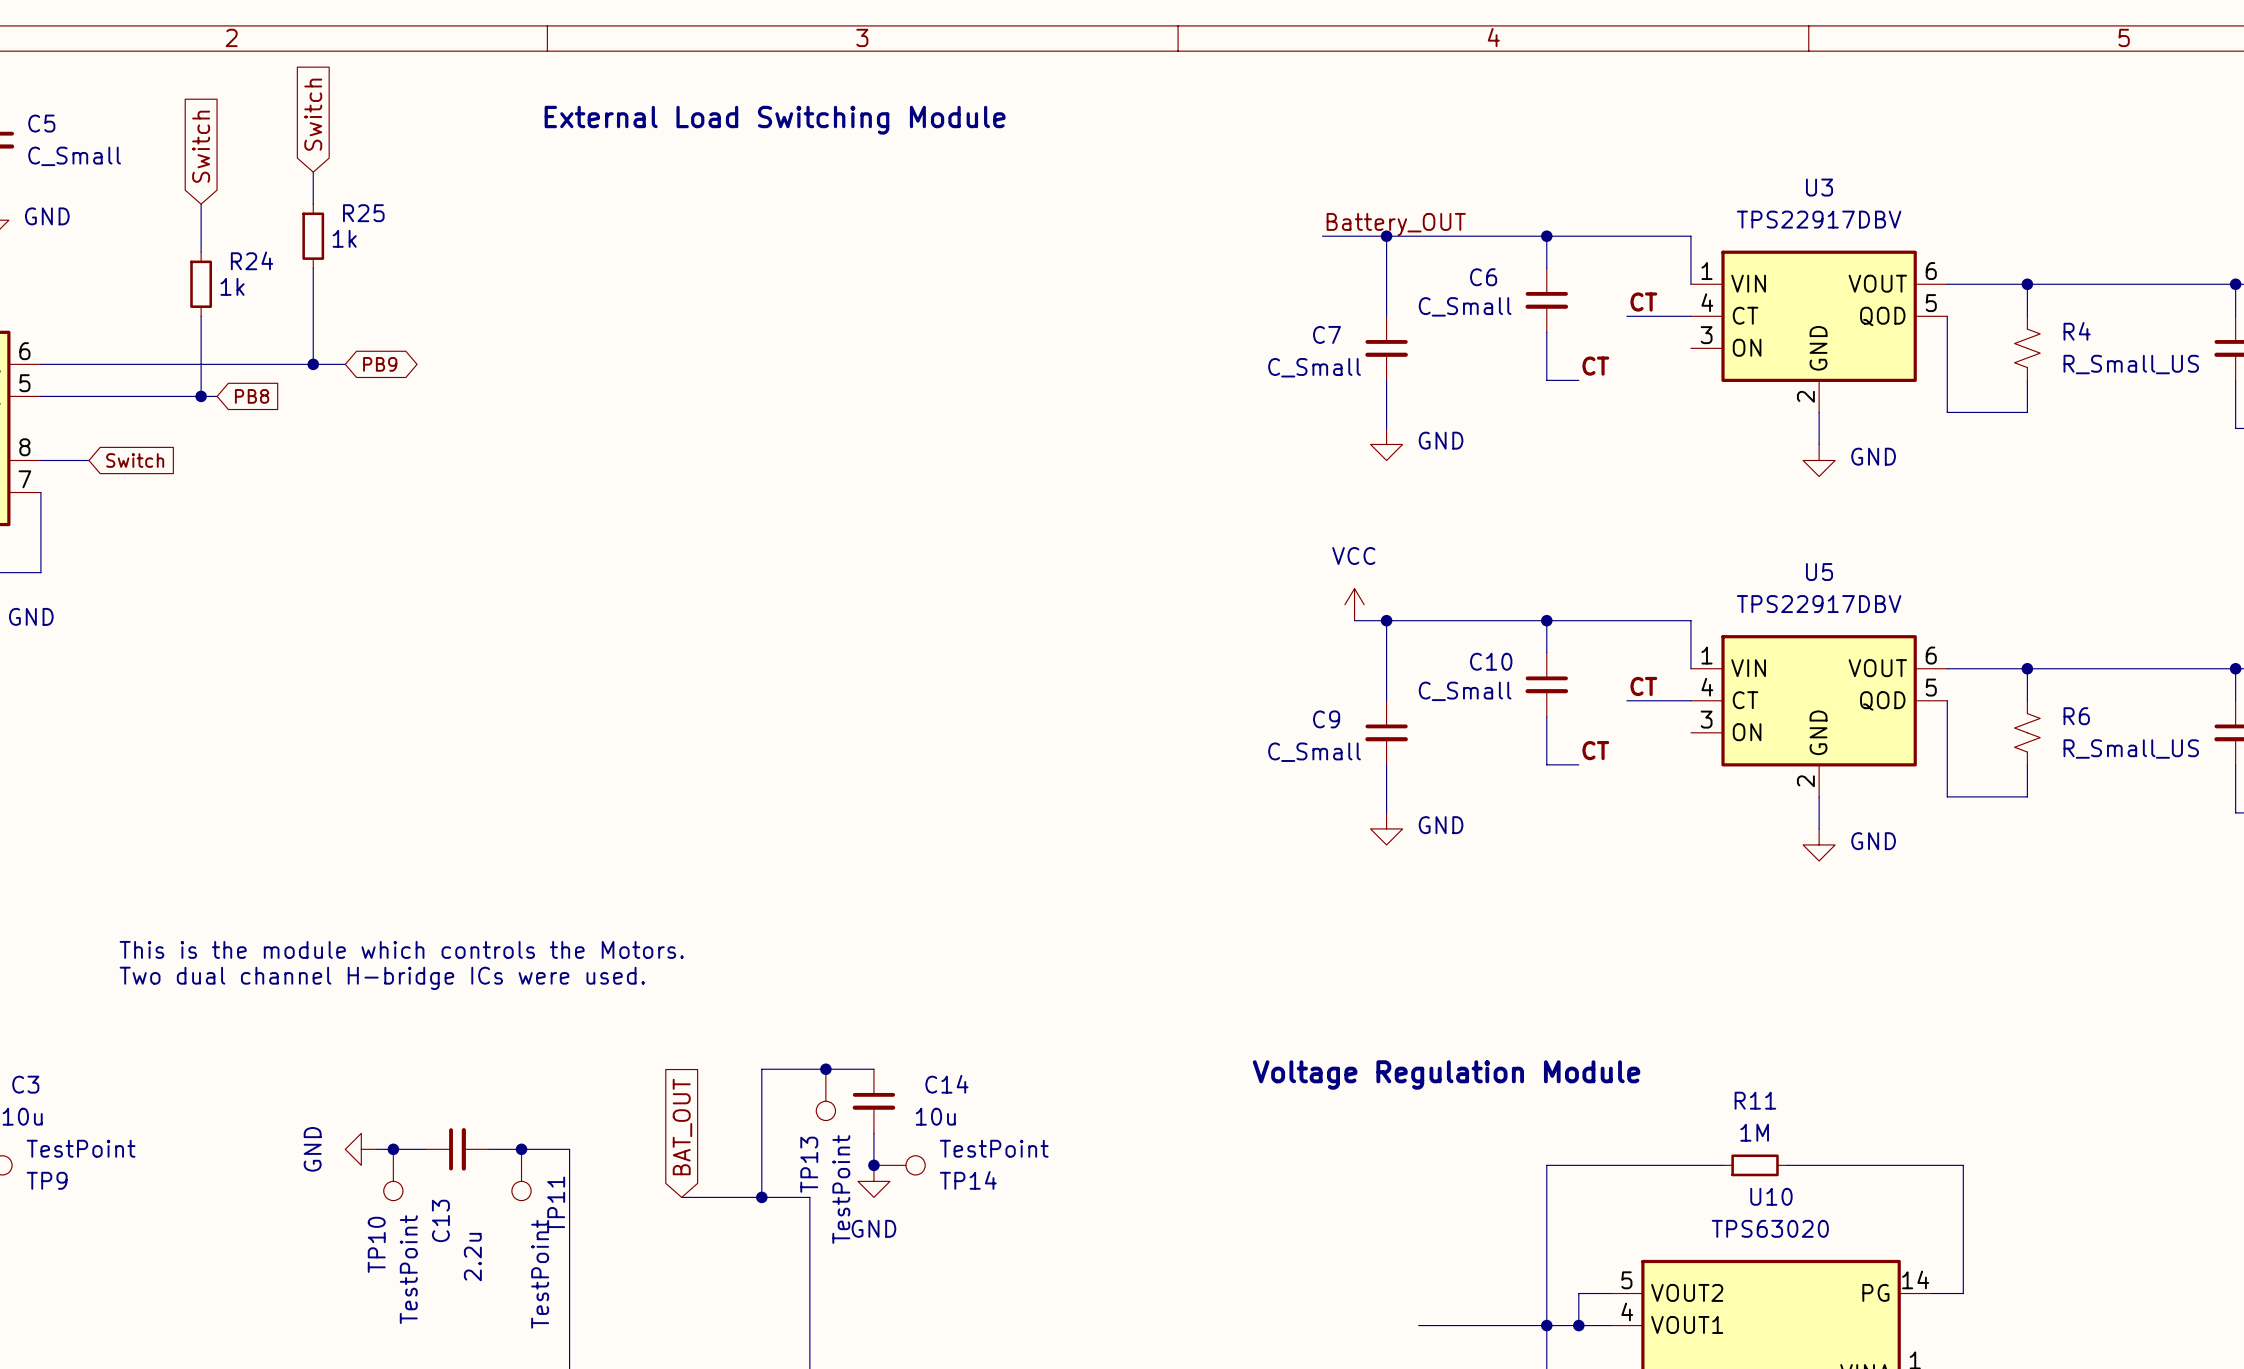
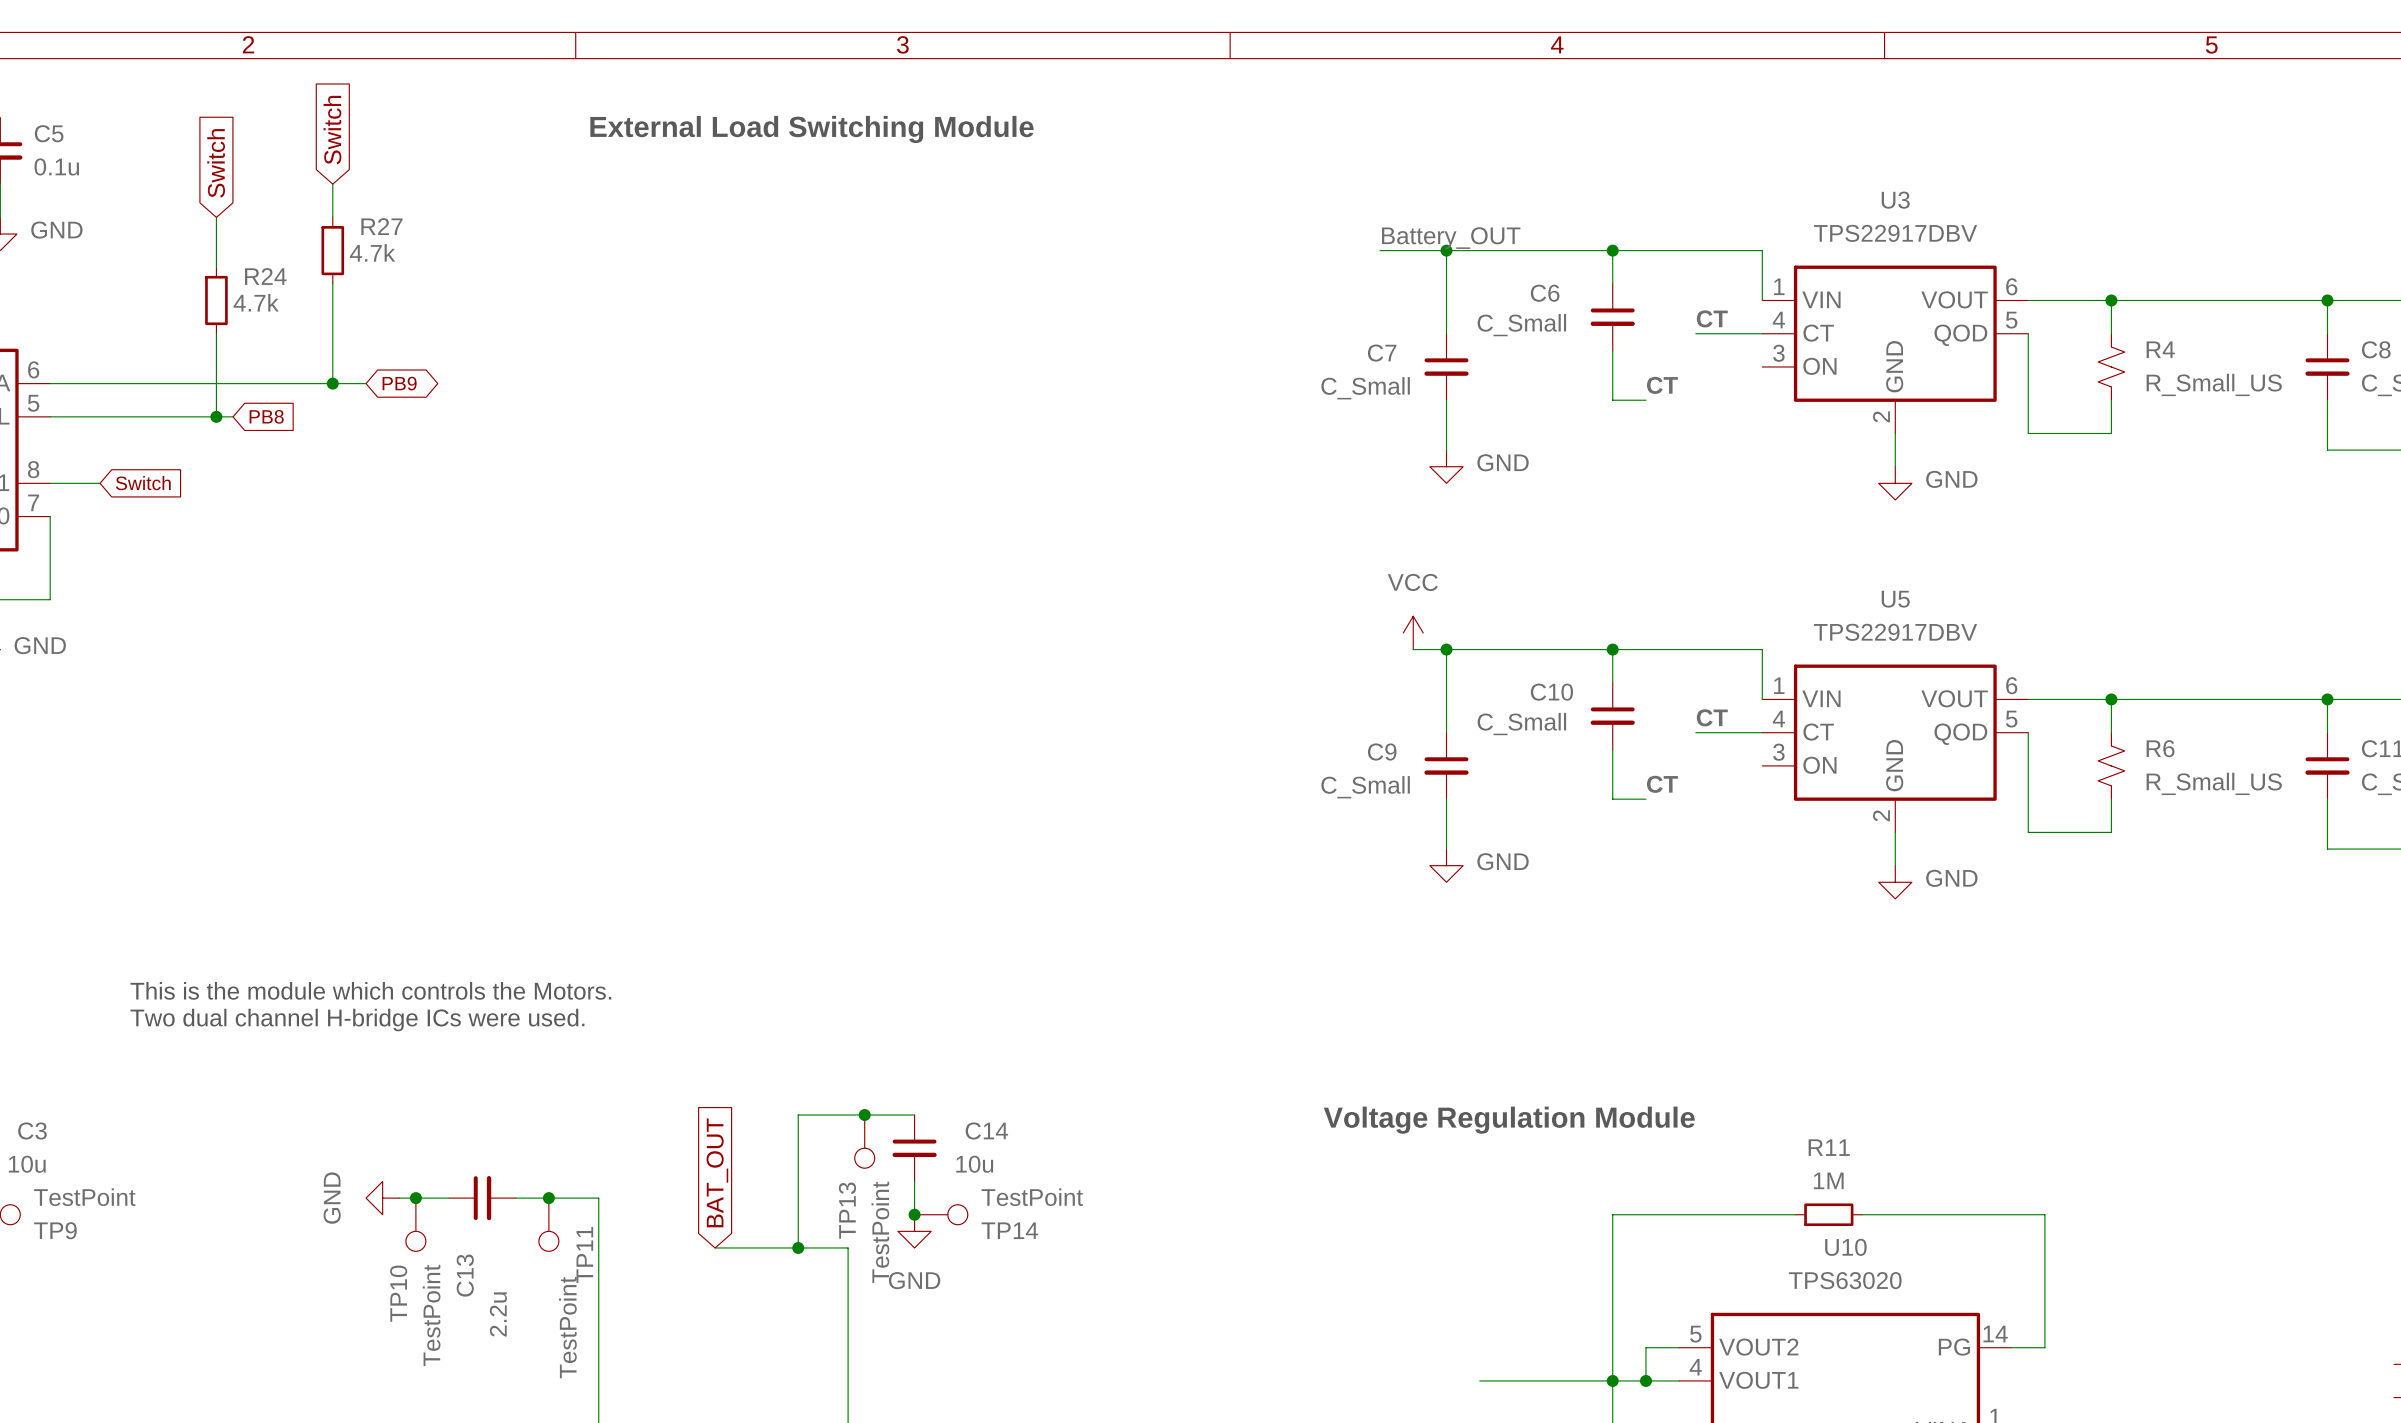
C5 value: C_Small (74, 156) -> 0.1u (56, 166)
R25 name: R25 (363, 213) -> R27 (381, 226)
R25 value: 1k (344, 238) -> 4.7k (372, 252)
R24 value: 1k (232, 286) -> 4.7k (256, 302)

